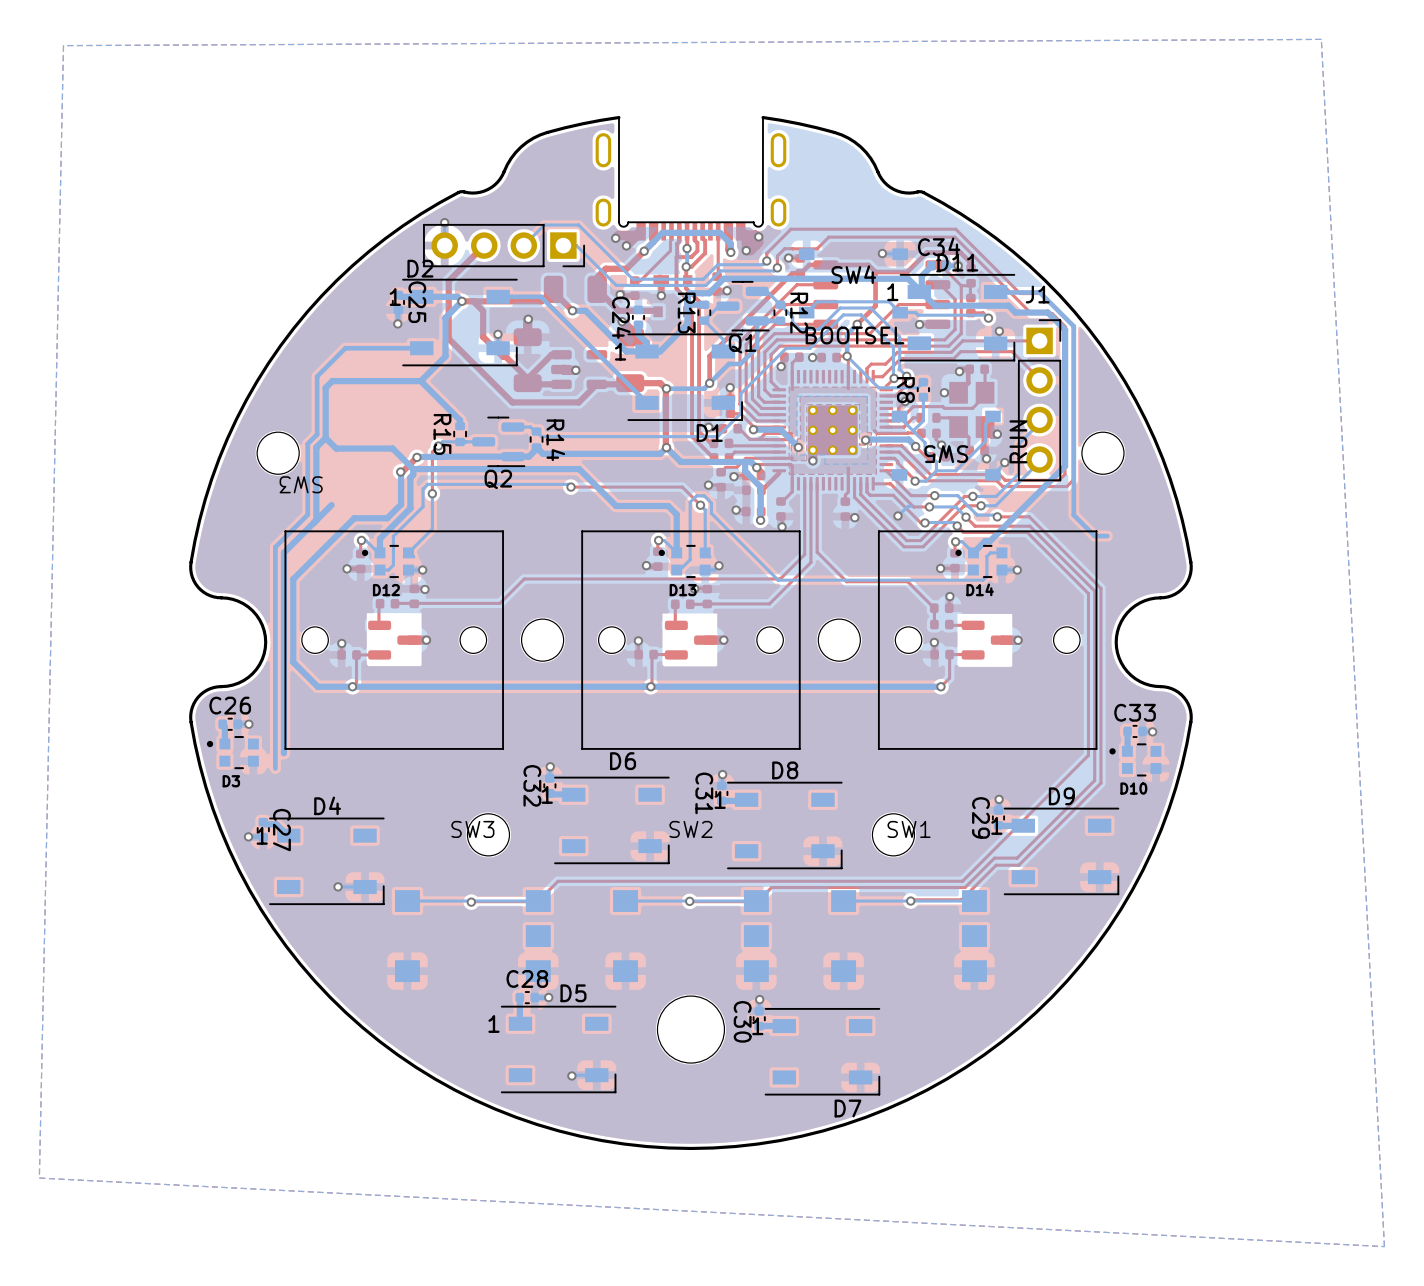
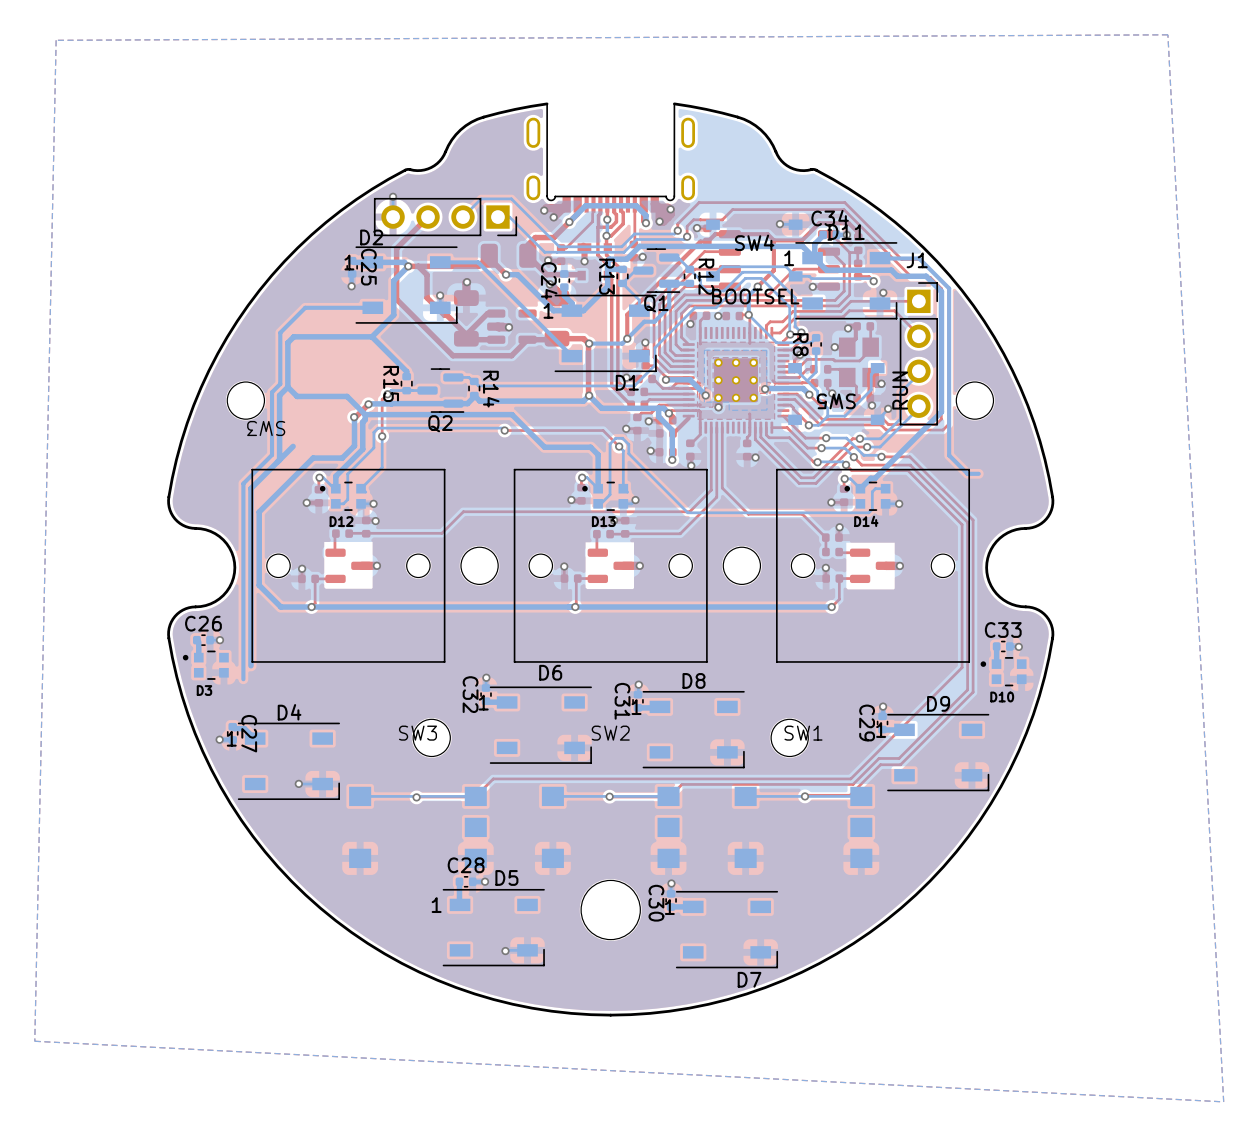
bottom track: (911, 506) (908, 506) (897, 515) (900, 514) -> none
via: (897, 515) -> none

